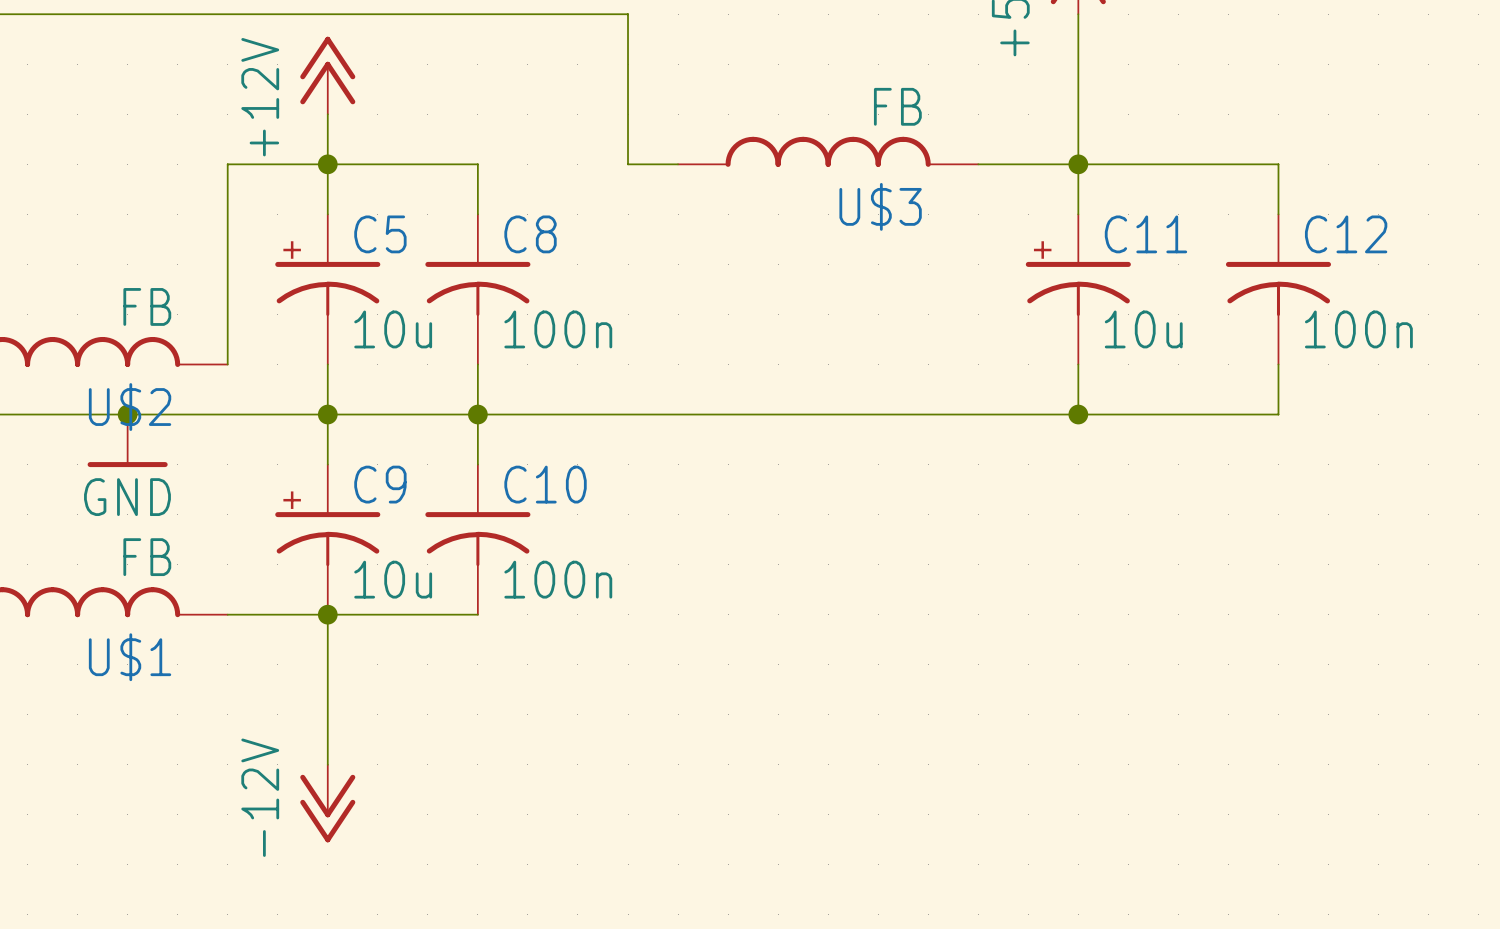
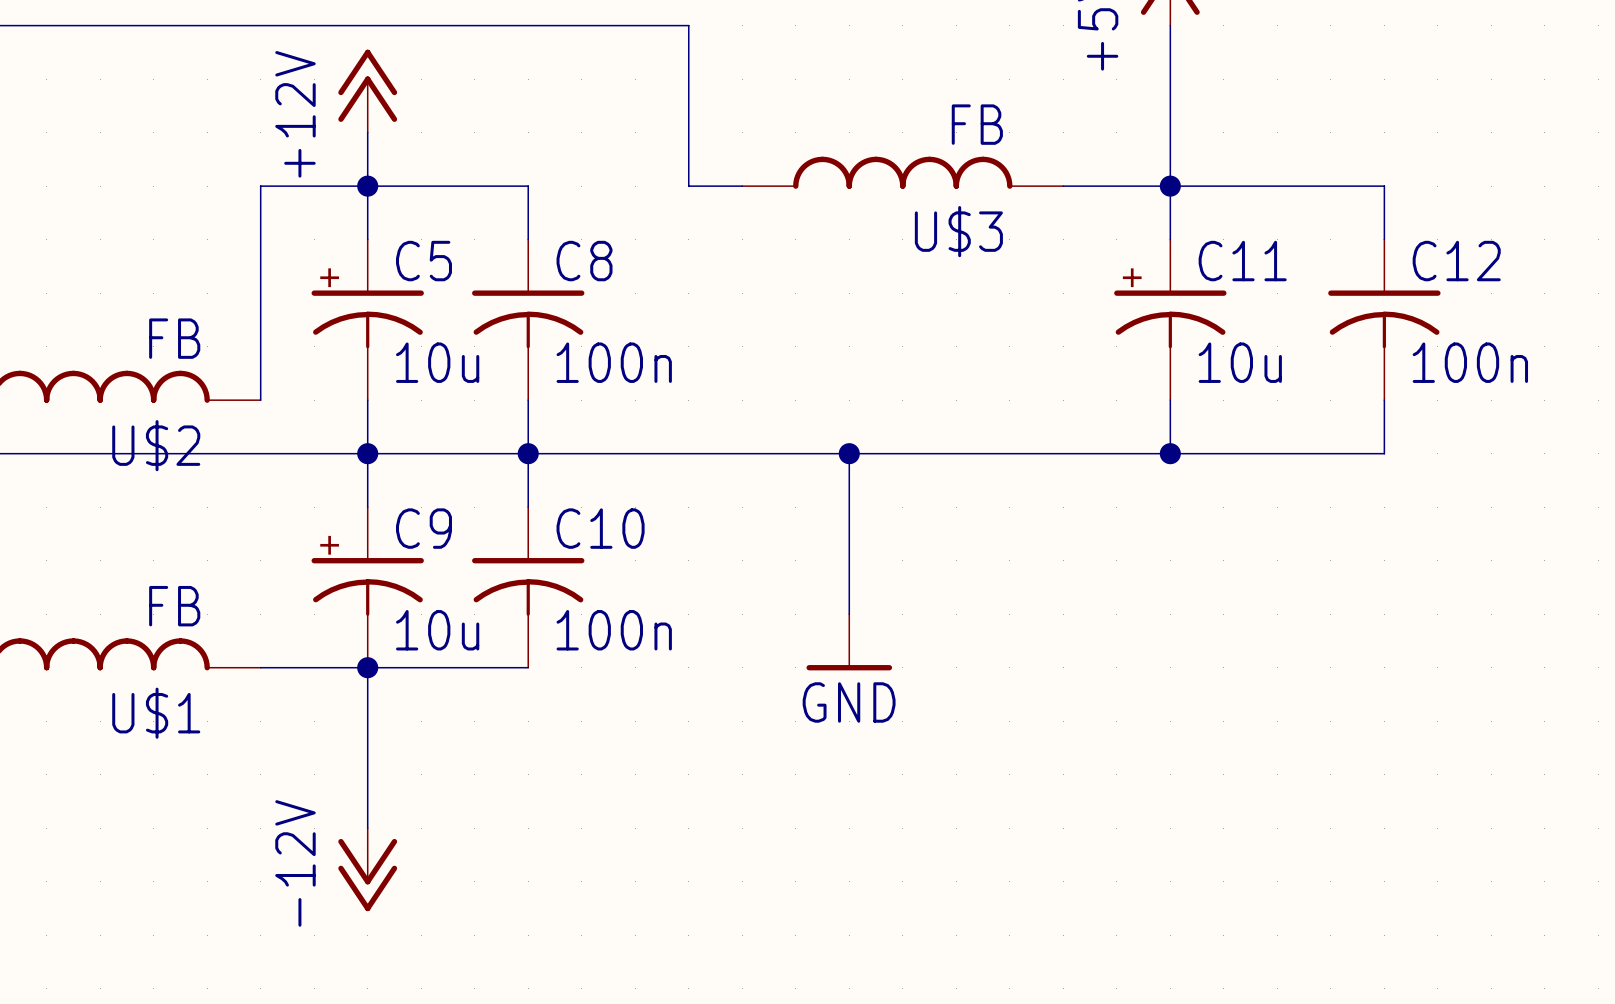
junction: (127, 414) -> none
wire: none -> (849, 453) (849, 614)
junction: none -> (849, 453)
power symbol: GND (127, 440) -> none
power symbol: none -> GND (849, 642)

